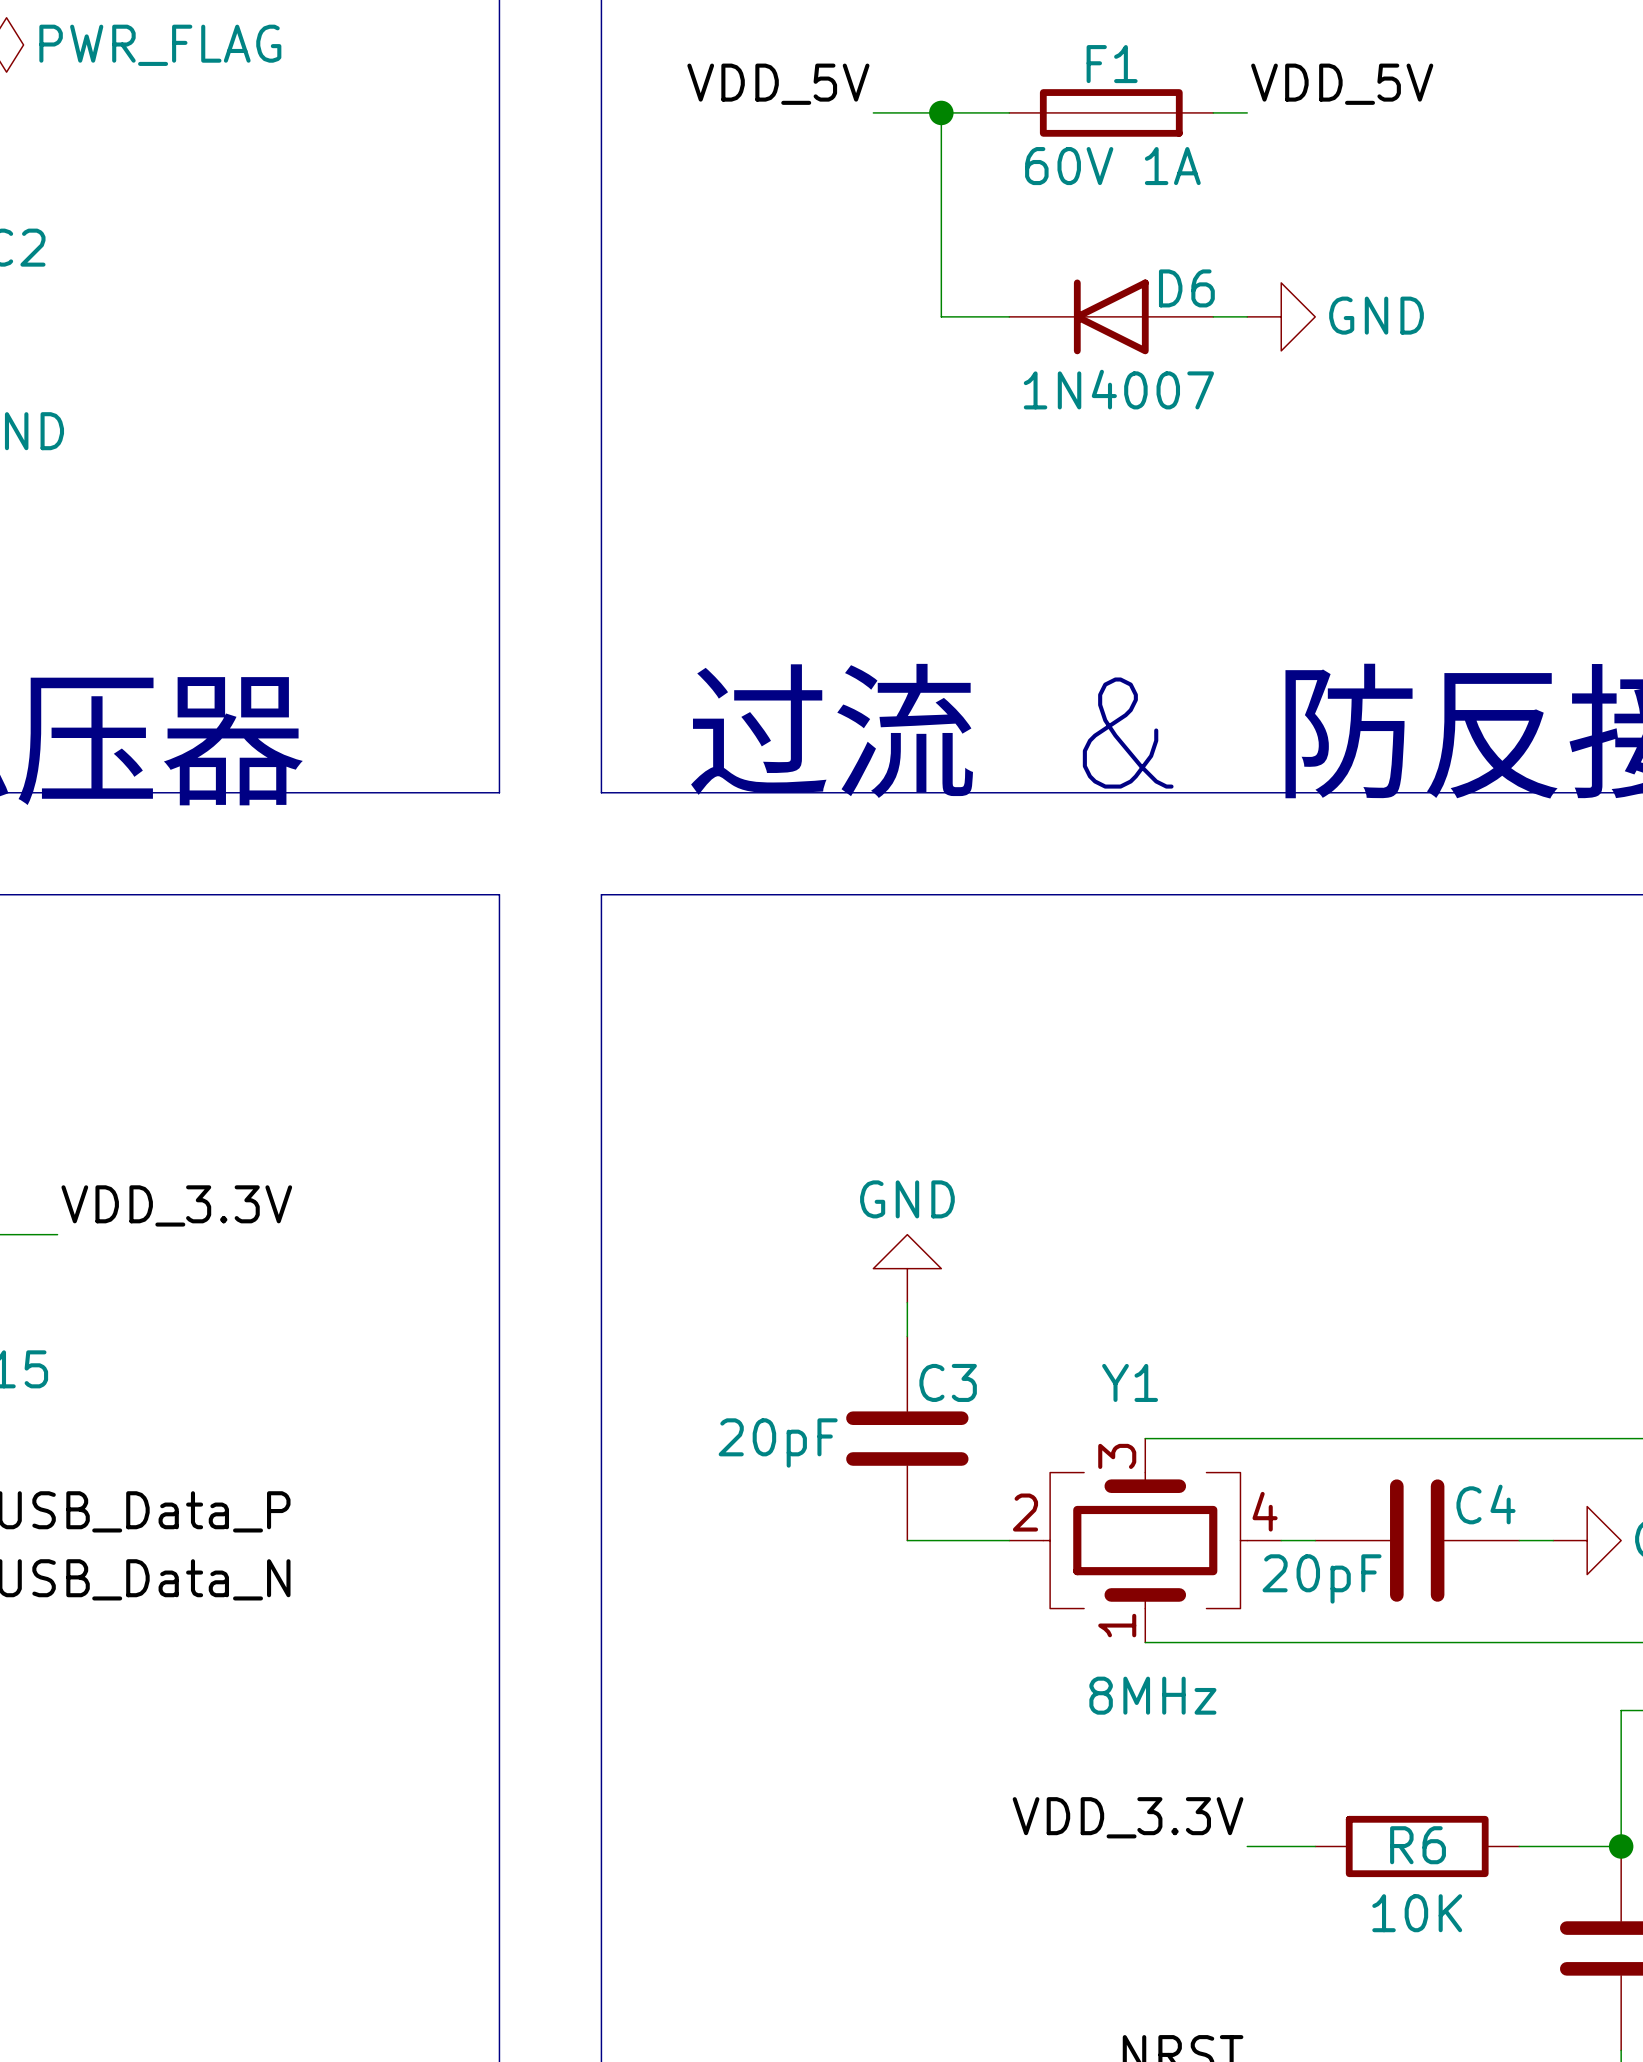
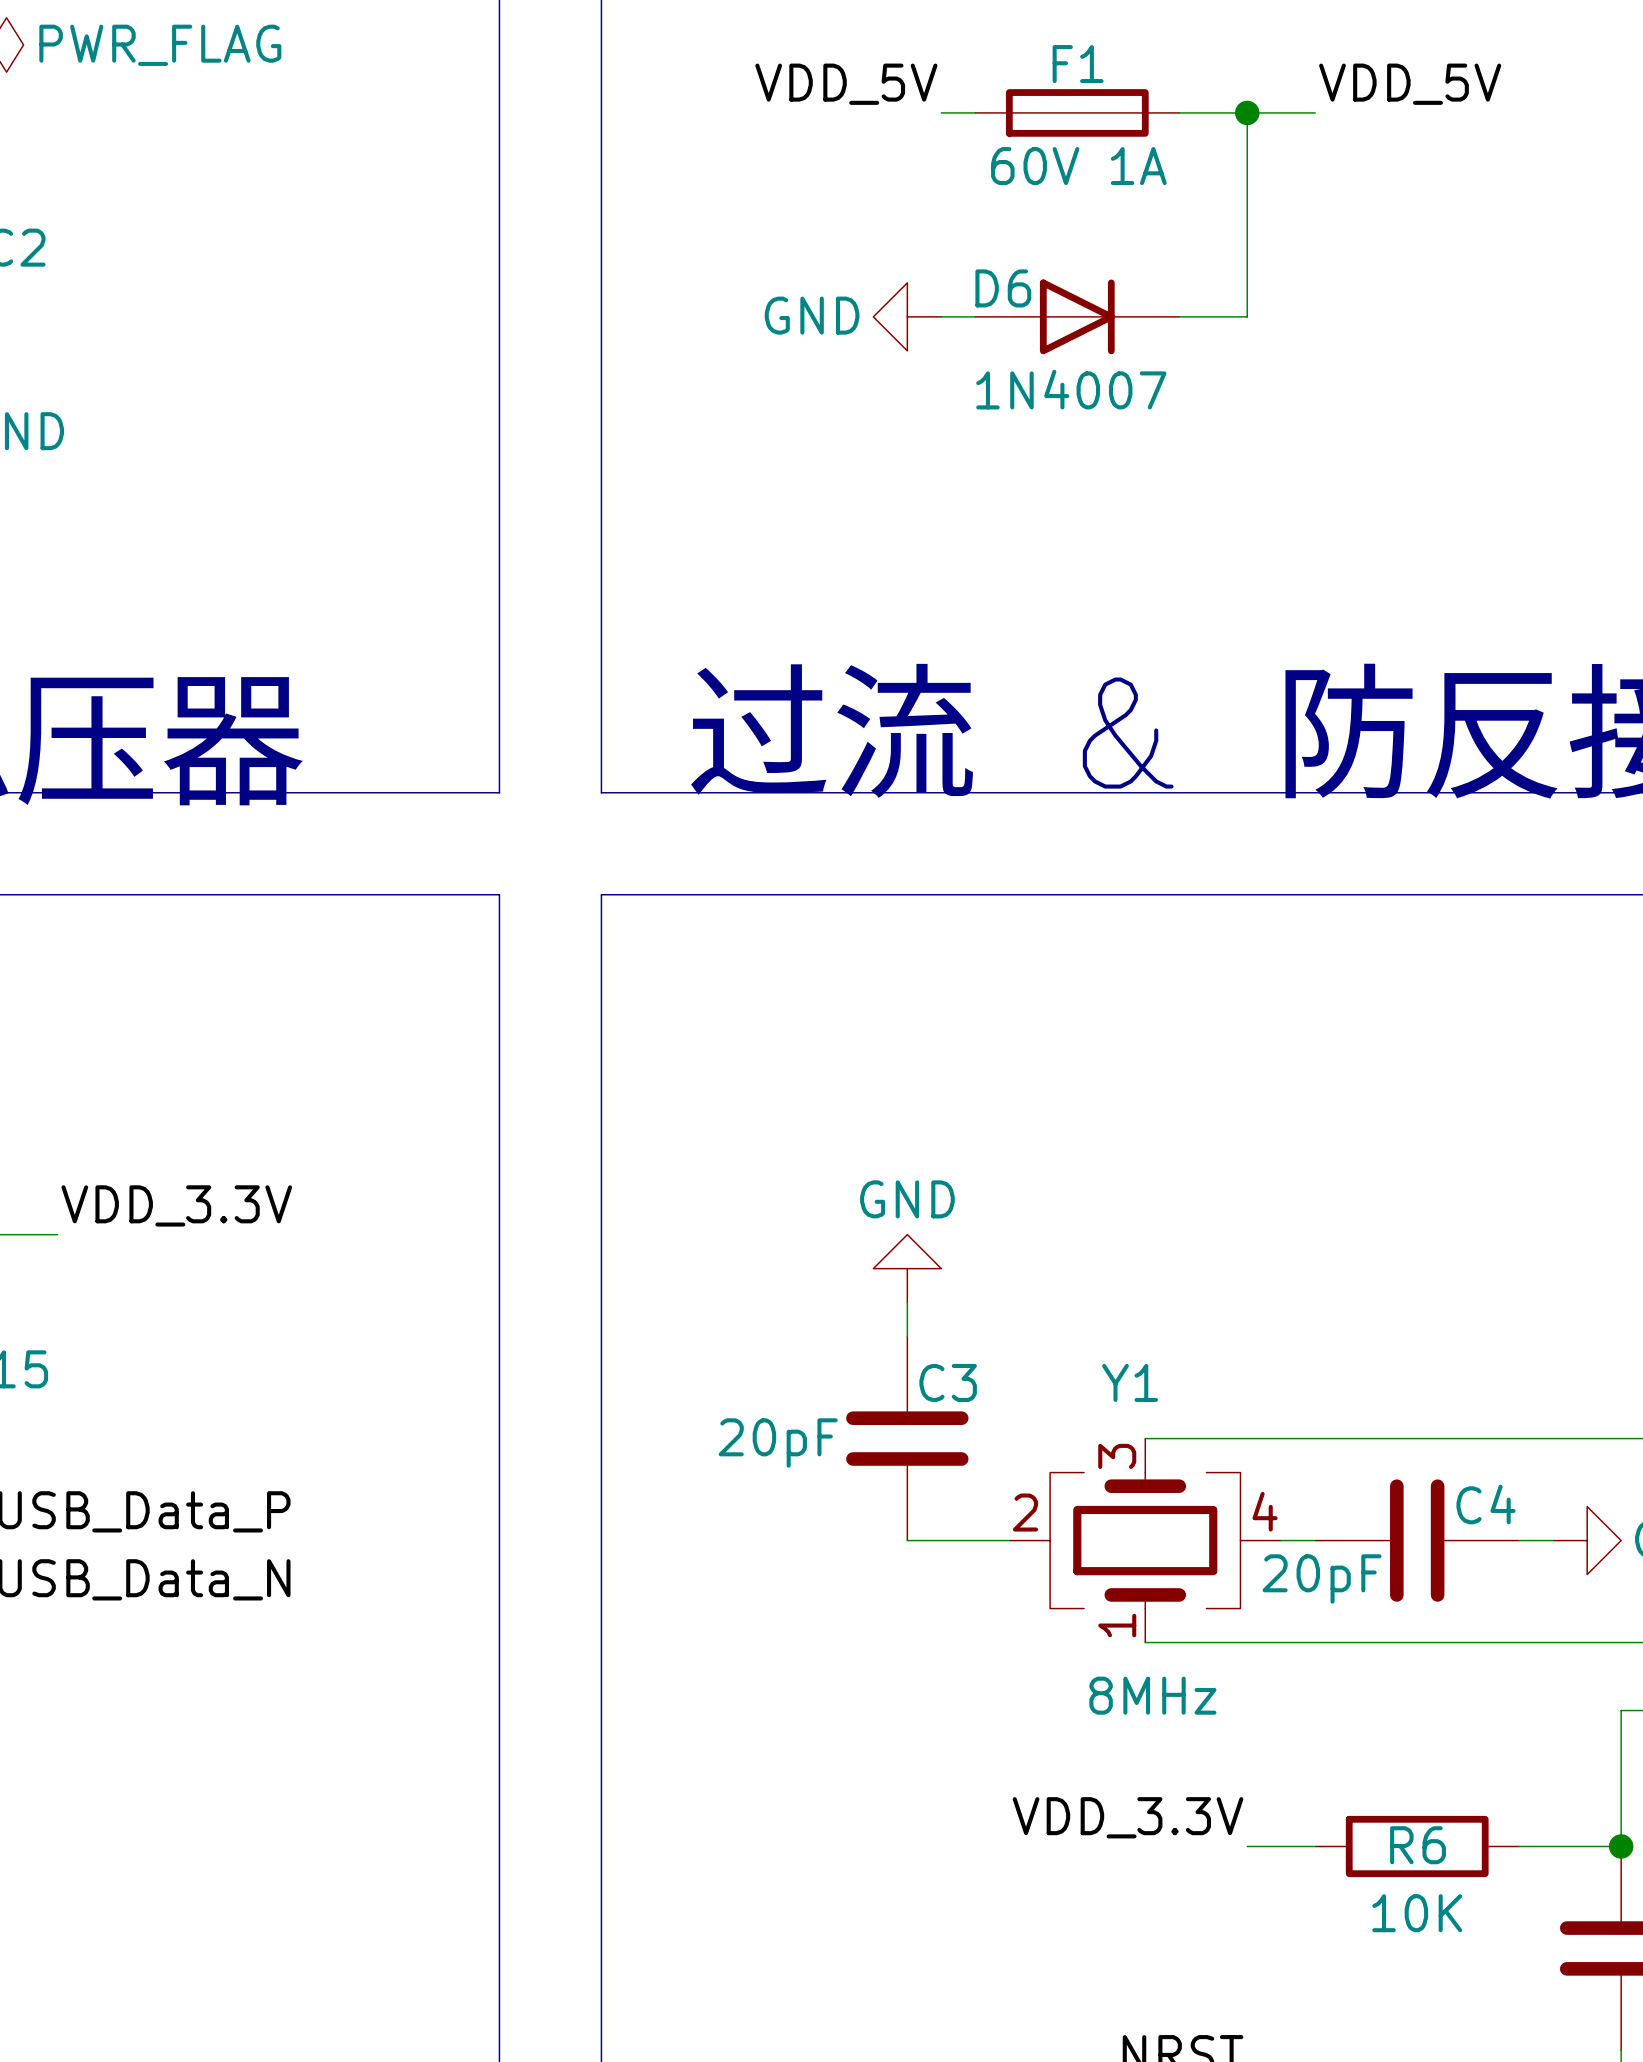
label position: VDD_5V (778, 84) -> VDD_5V (846, 84)
label position: VDD_5V (1342, 84) -> VDD_5V (1410, 84)
wire: (873, 112) (941, 112) (941, 316) -> none
junction: (941, 112) -> none
F1 position: (1111, 112) -> (1077, 112)
junction: none -> (1247, 112)
wire: none -> (1315, 112) (1247, 112) (1247, 316)
D6 rotation: 0° (1111, 316) -> 180° (1077, 316)
power symbol rotation: 0° (1281, 316) -> 180° (907, 316)
power symbol position: GND (1281, 316) -> GND (907, 316)

